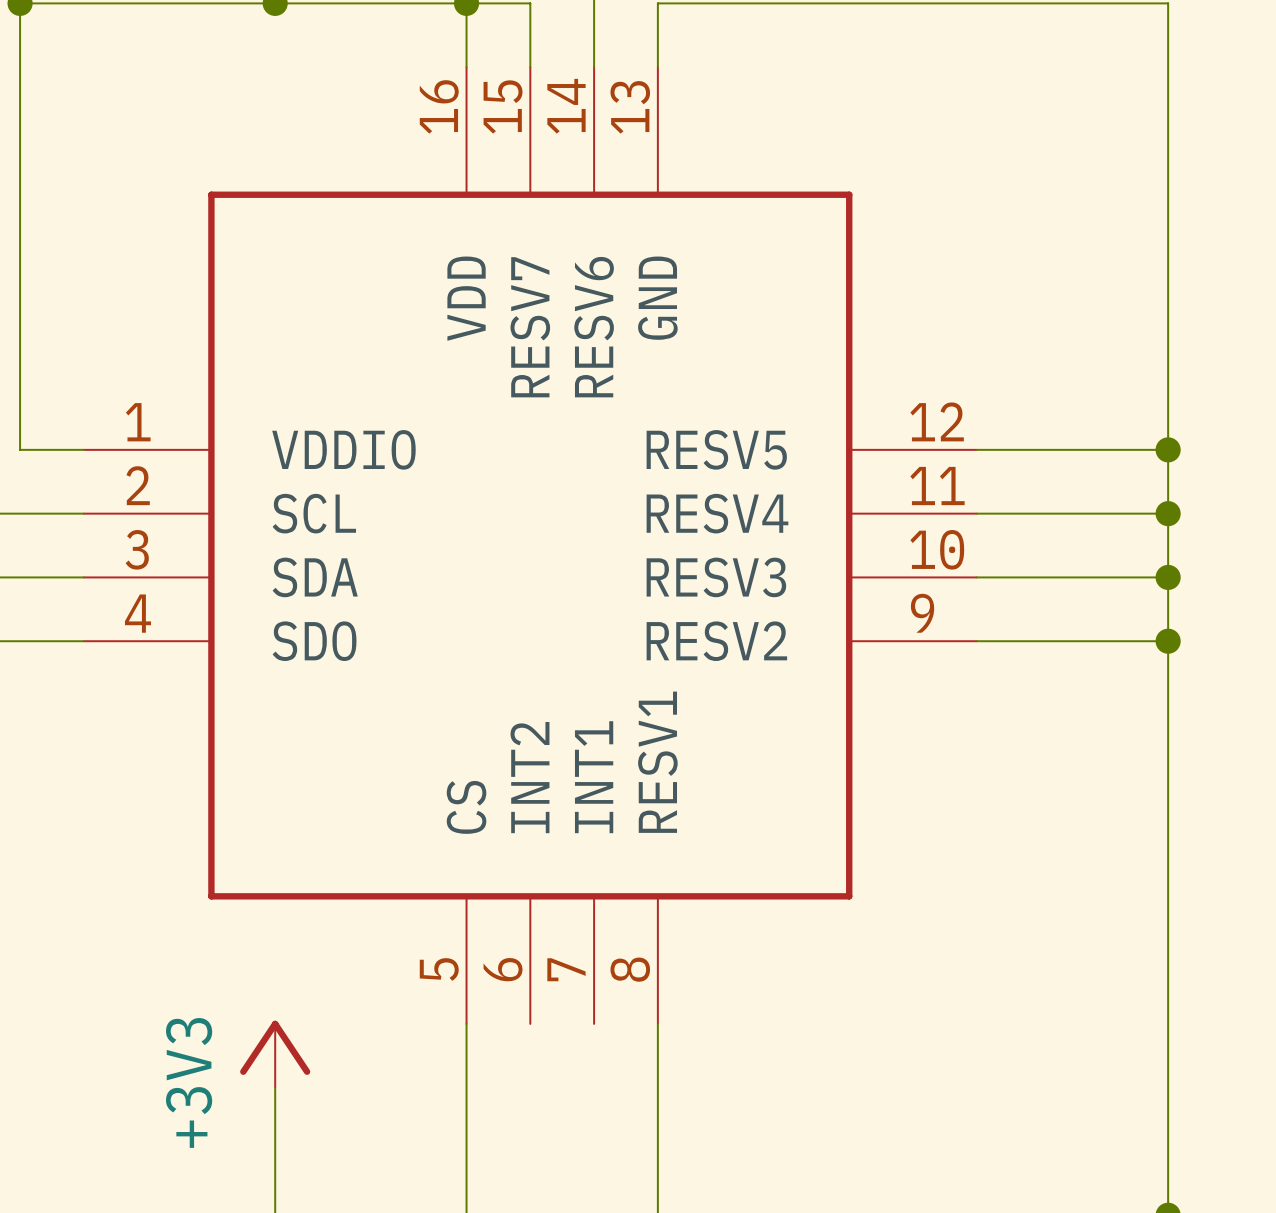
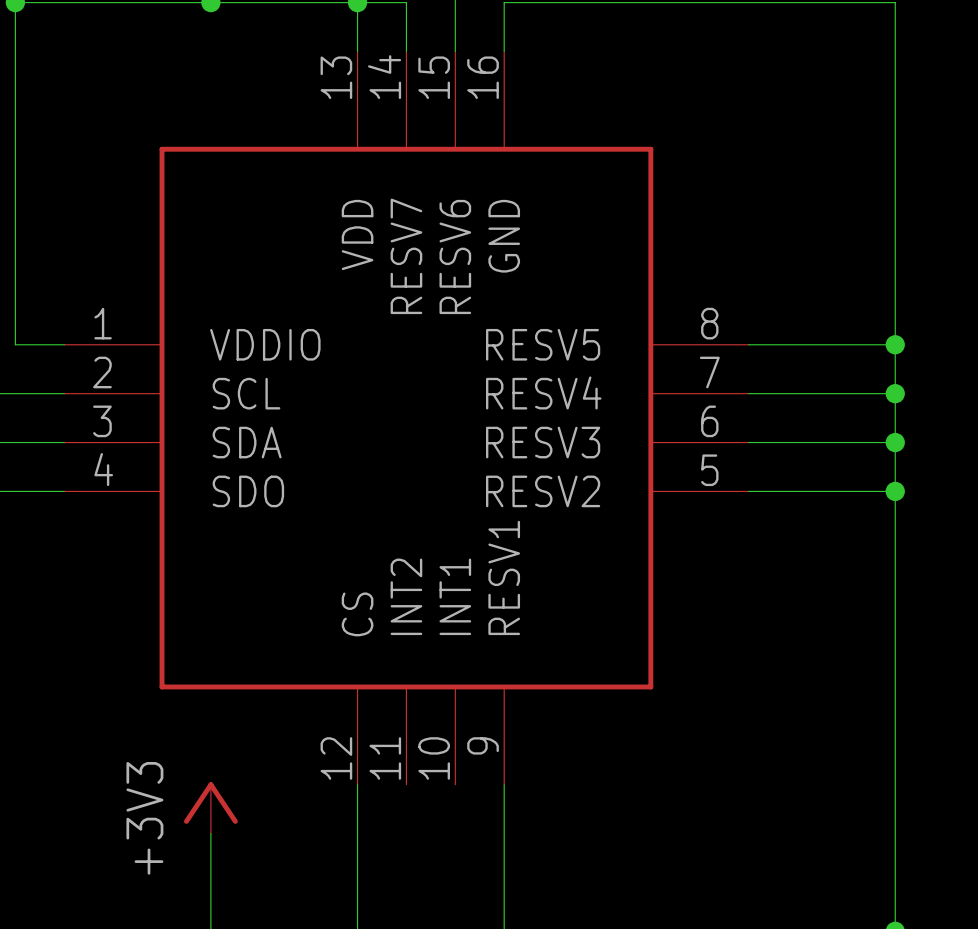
part symbol: [83, 67, 977, 1024] -> [64, 51, 749, 785]

